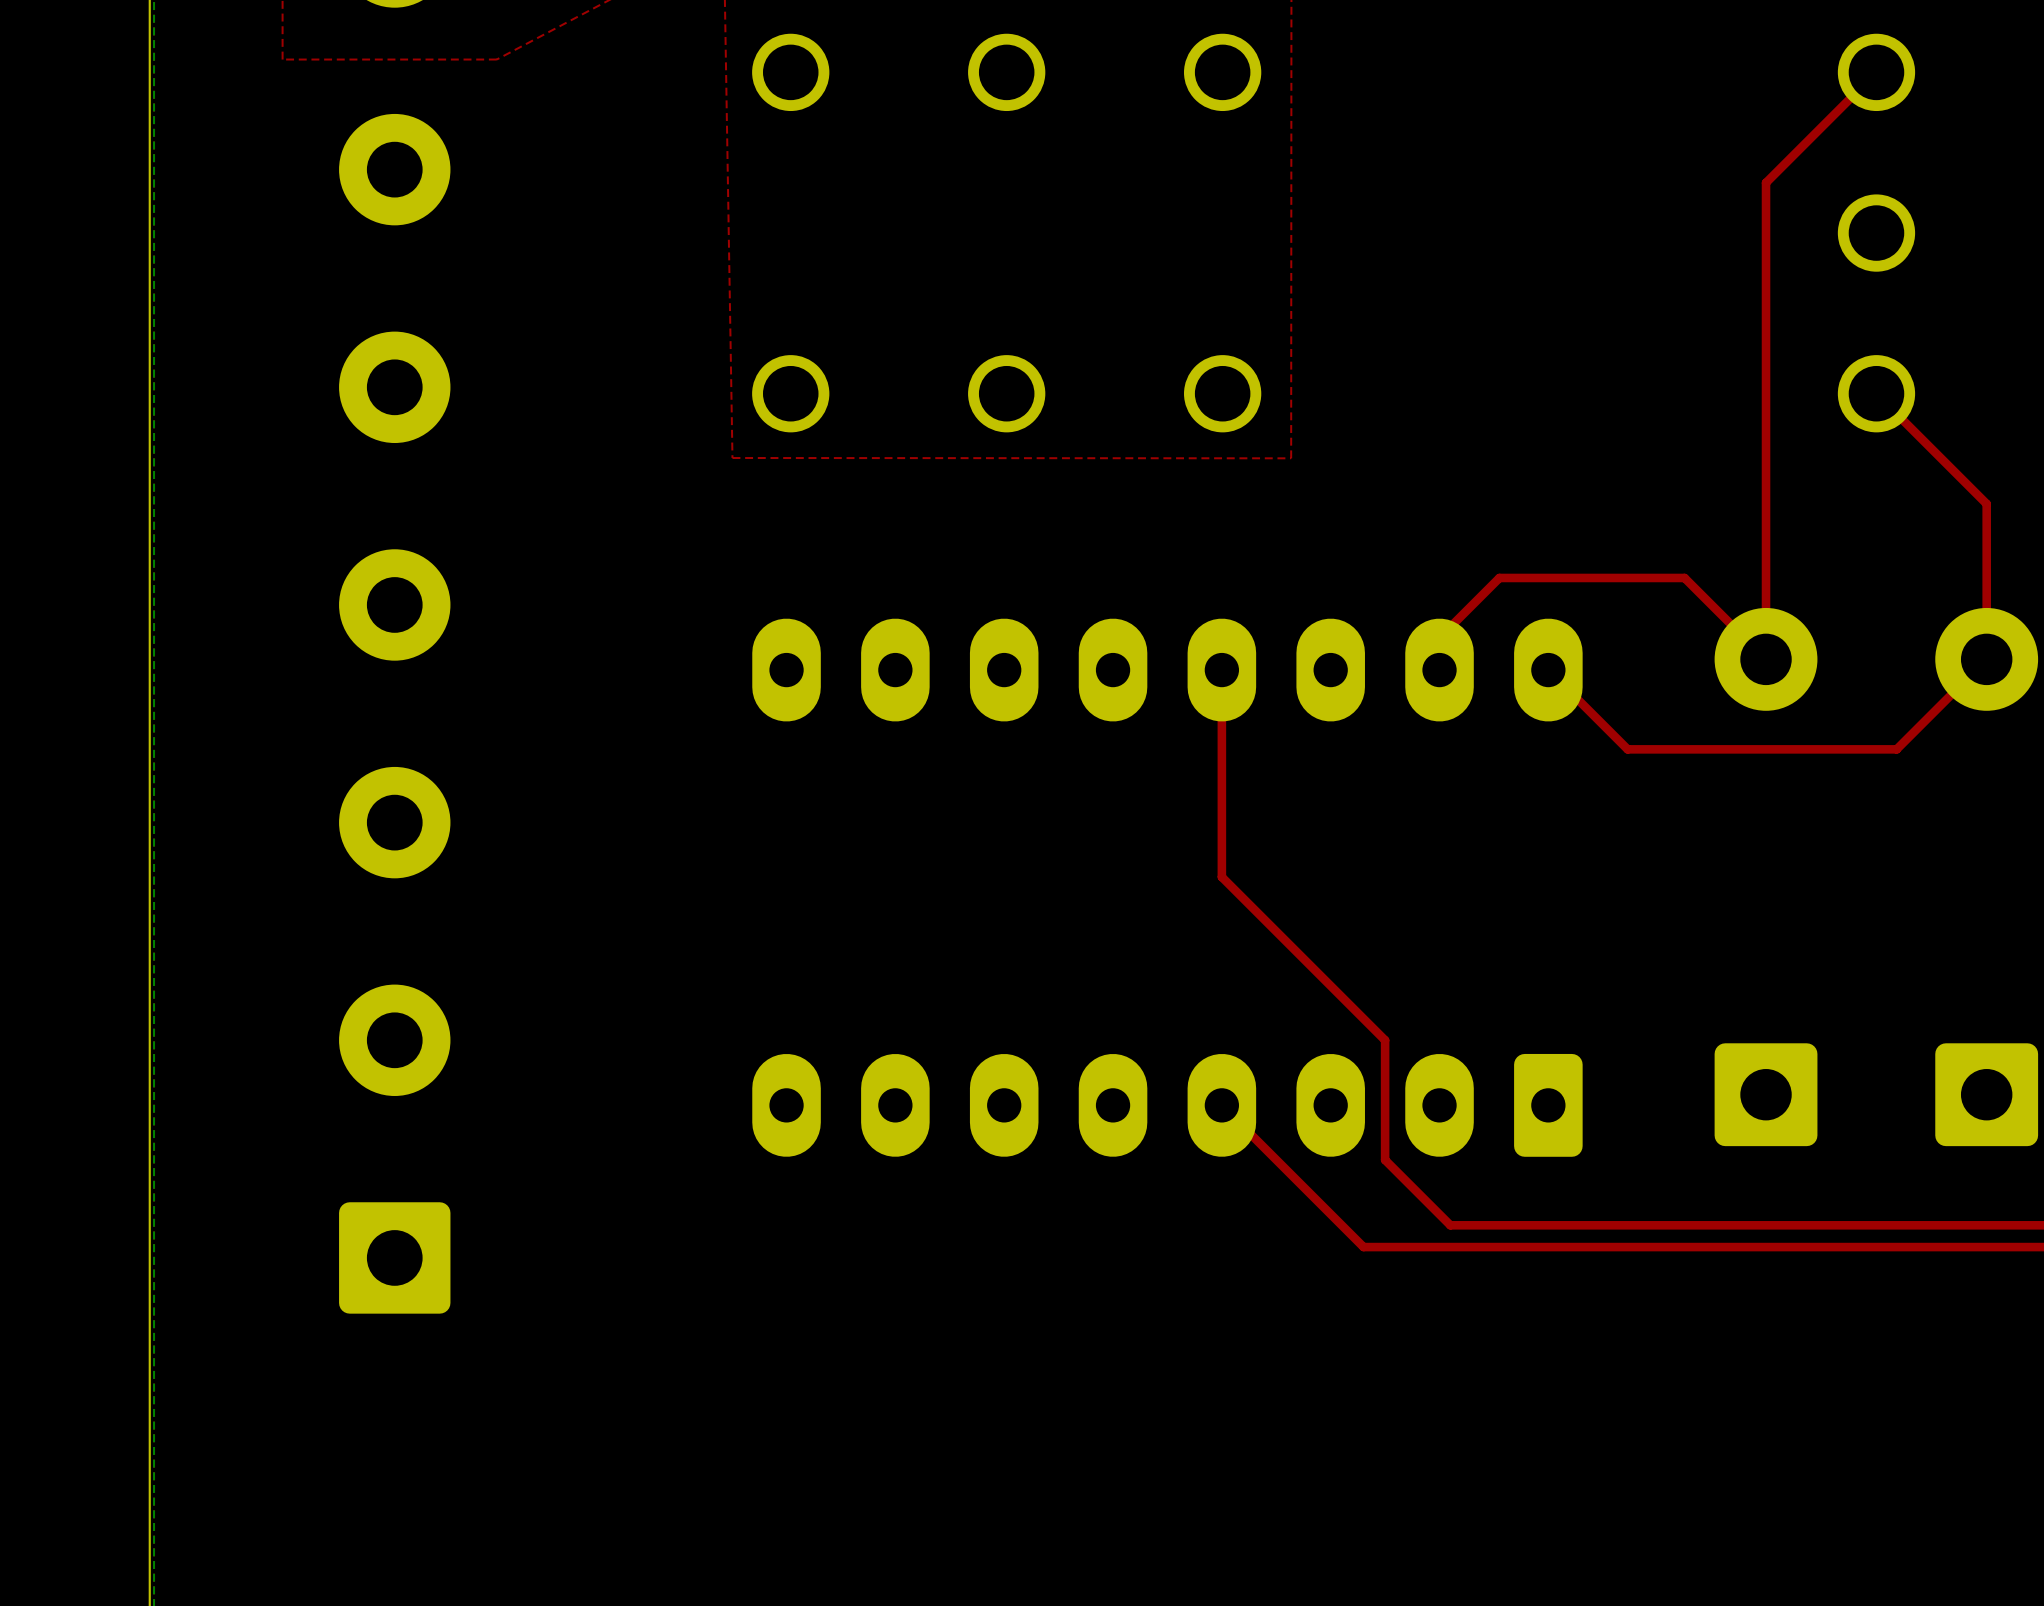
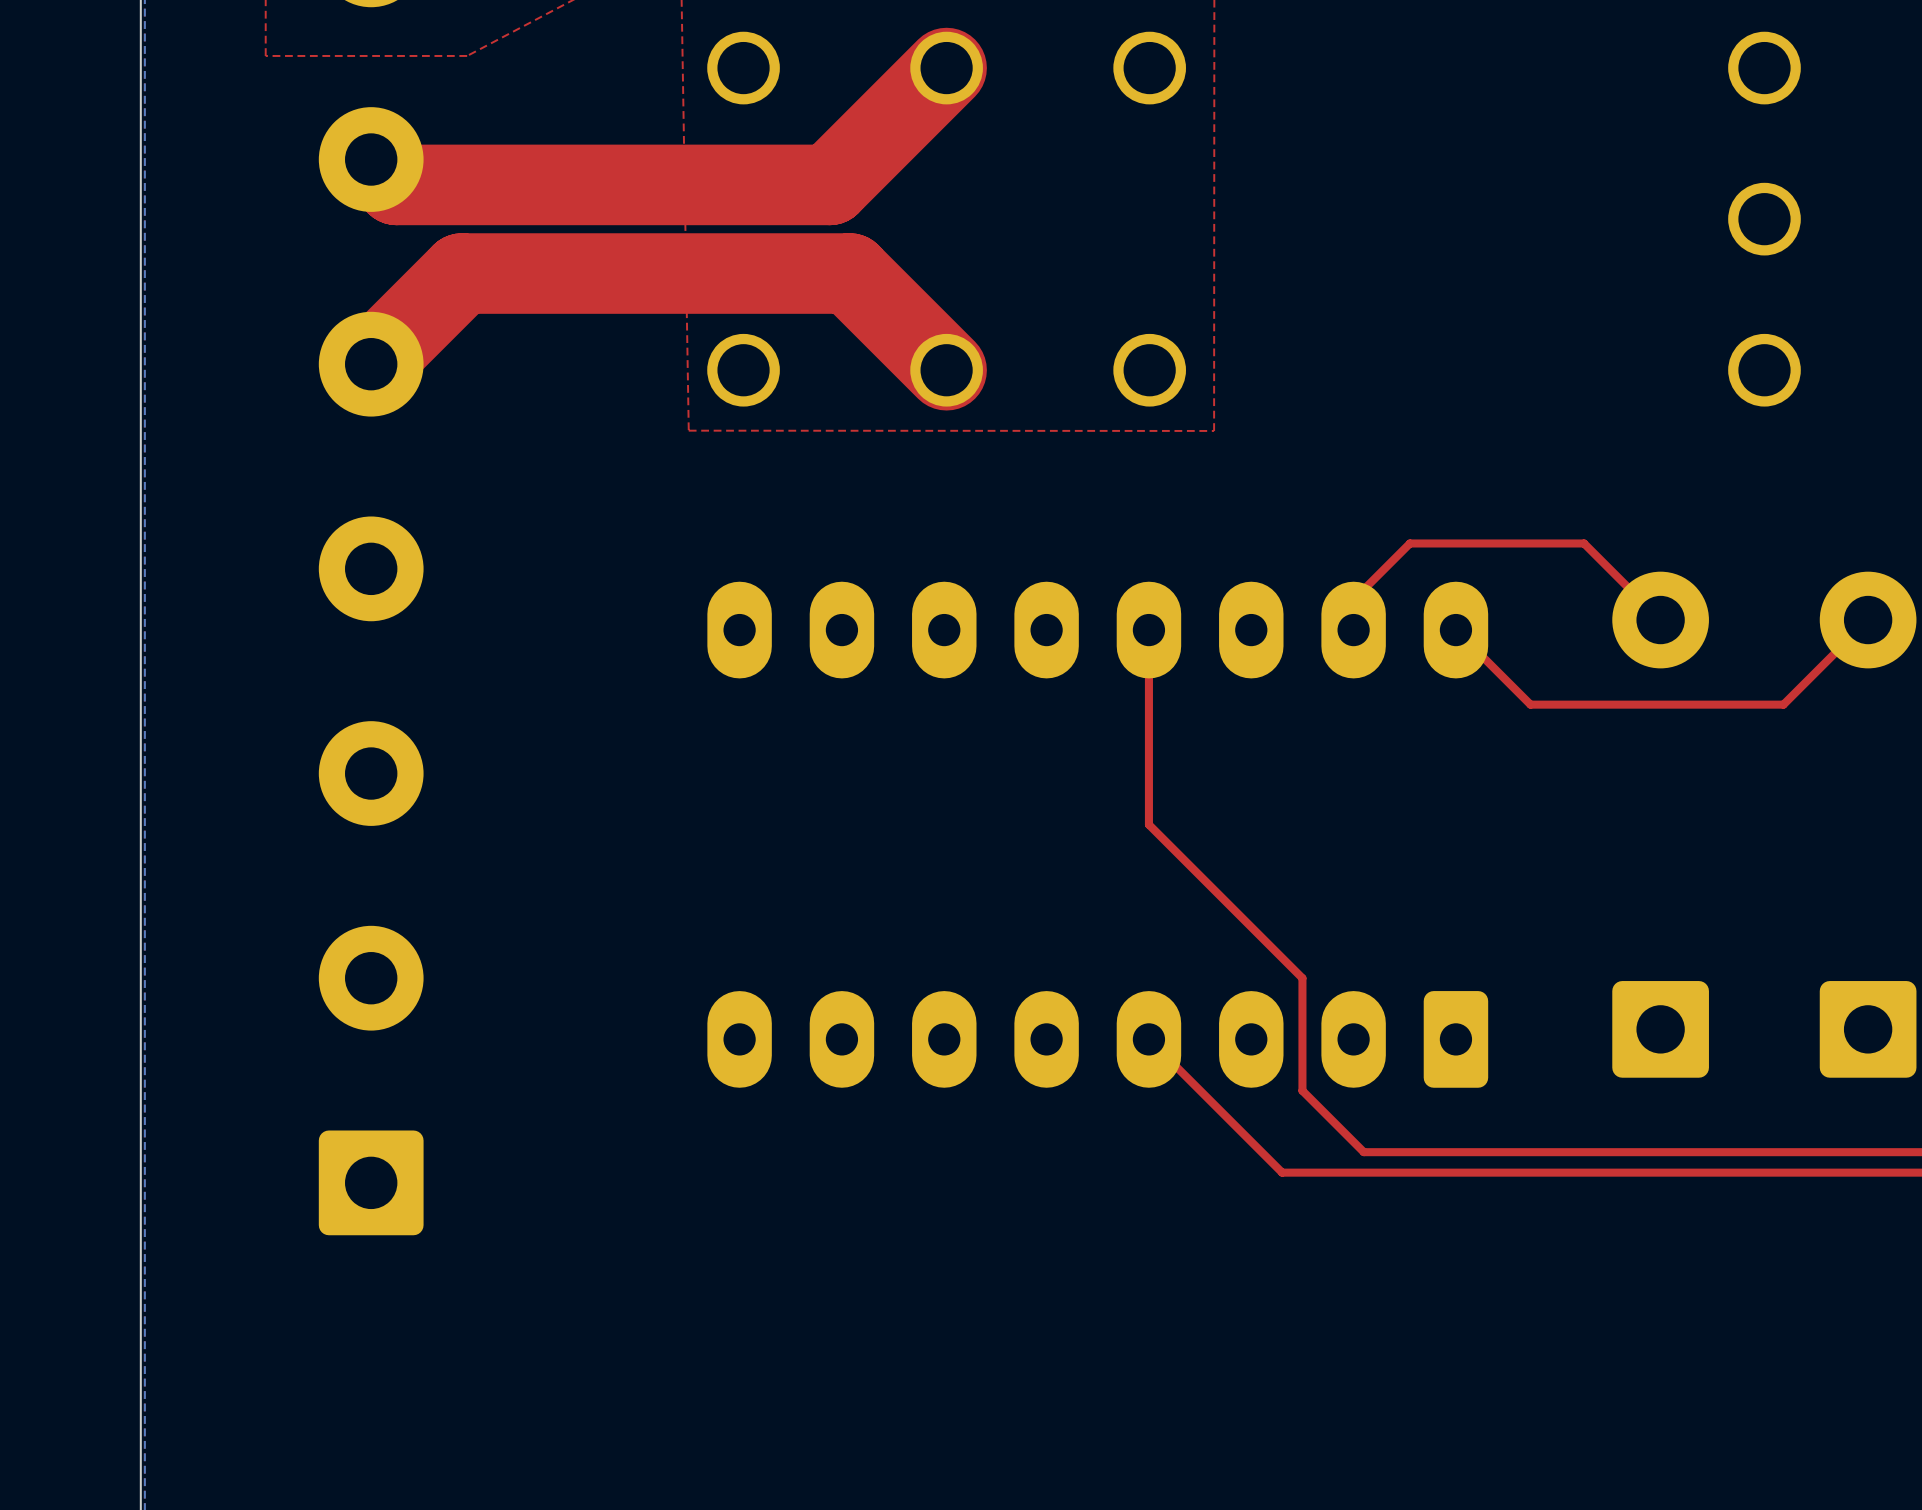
top track: none -> (946, 68) (829, 184) (396, 184) (371, 159)
top track: (1876, 72) (1766, 182) (1766, 659) -> none
top track: none -> (371, 364) (461, 273) (849, 273) (946, 370)
top track: (1876, 393) (1986, 503) (1986, 659) -> none

